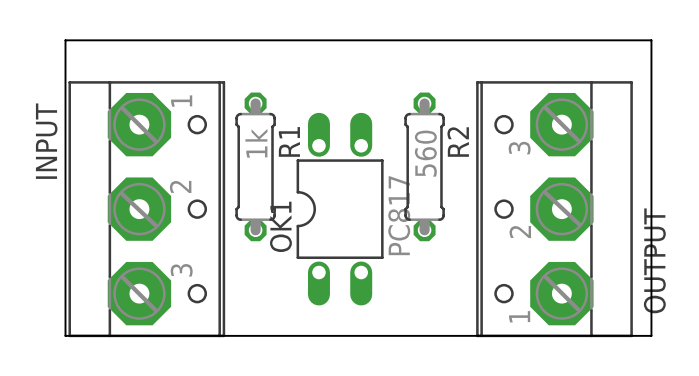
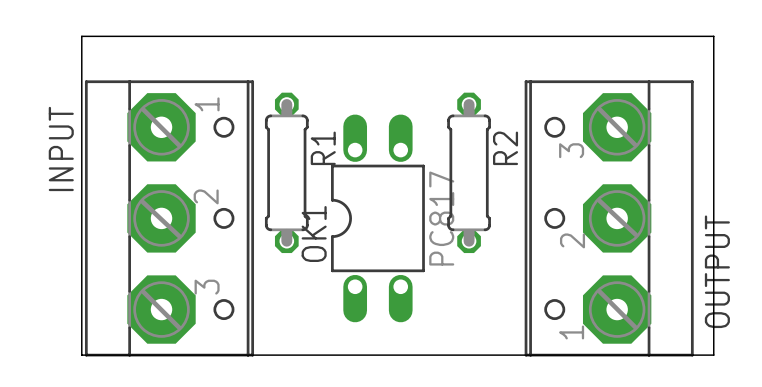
R1 value: 1k (256, 143) -> none
R2 value: 560 (425, 153) -> none

